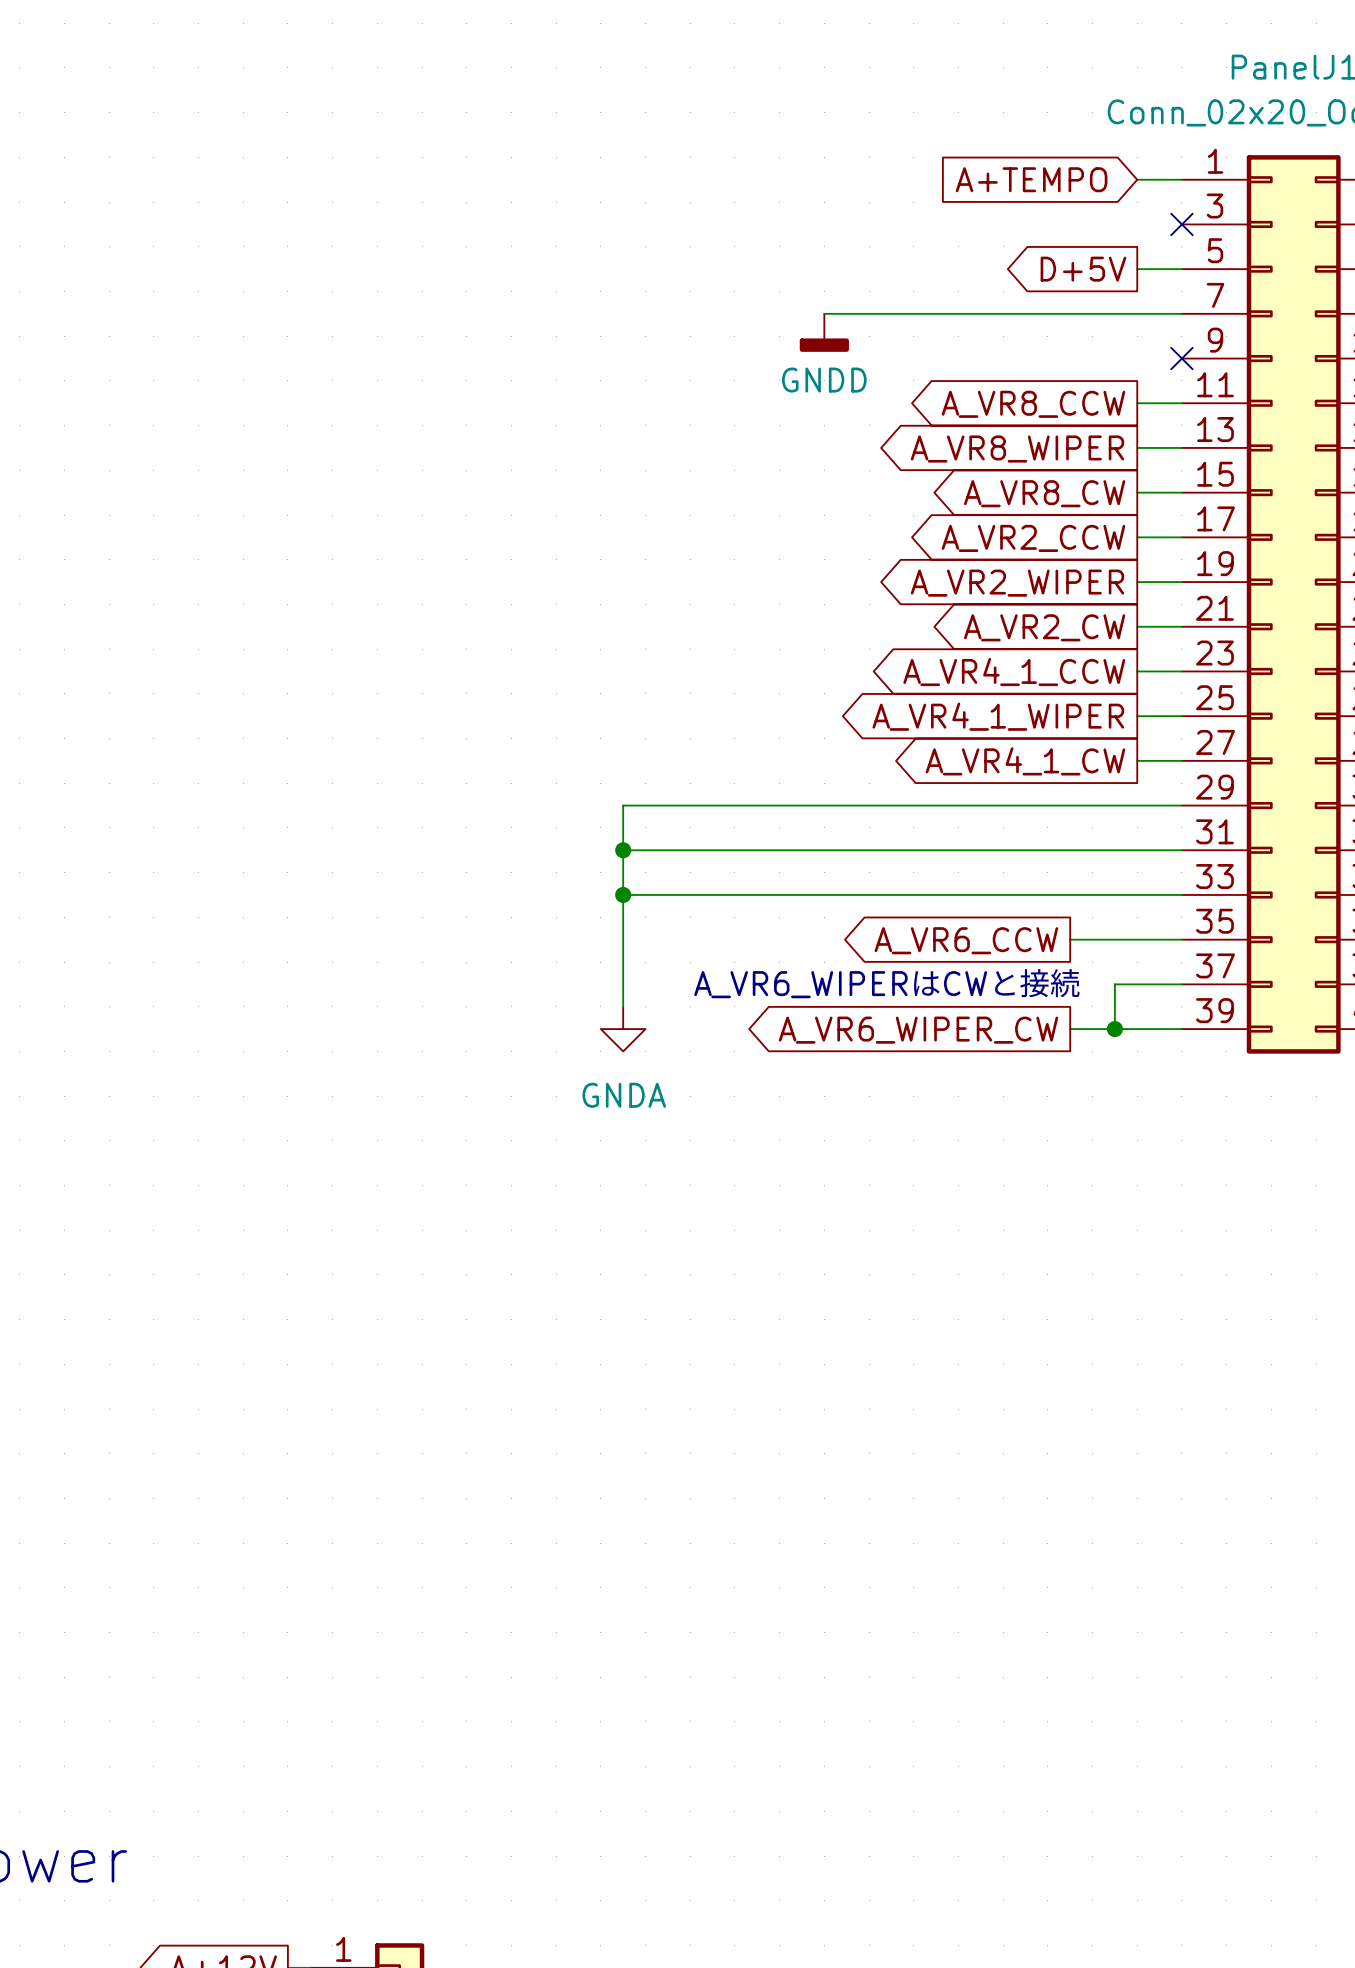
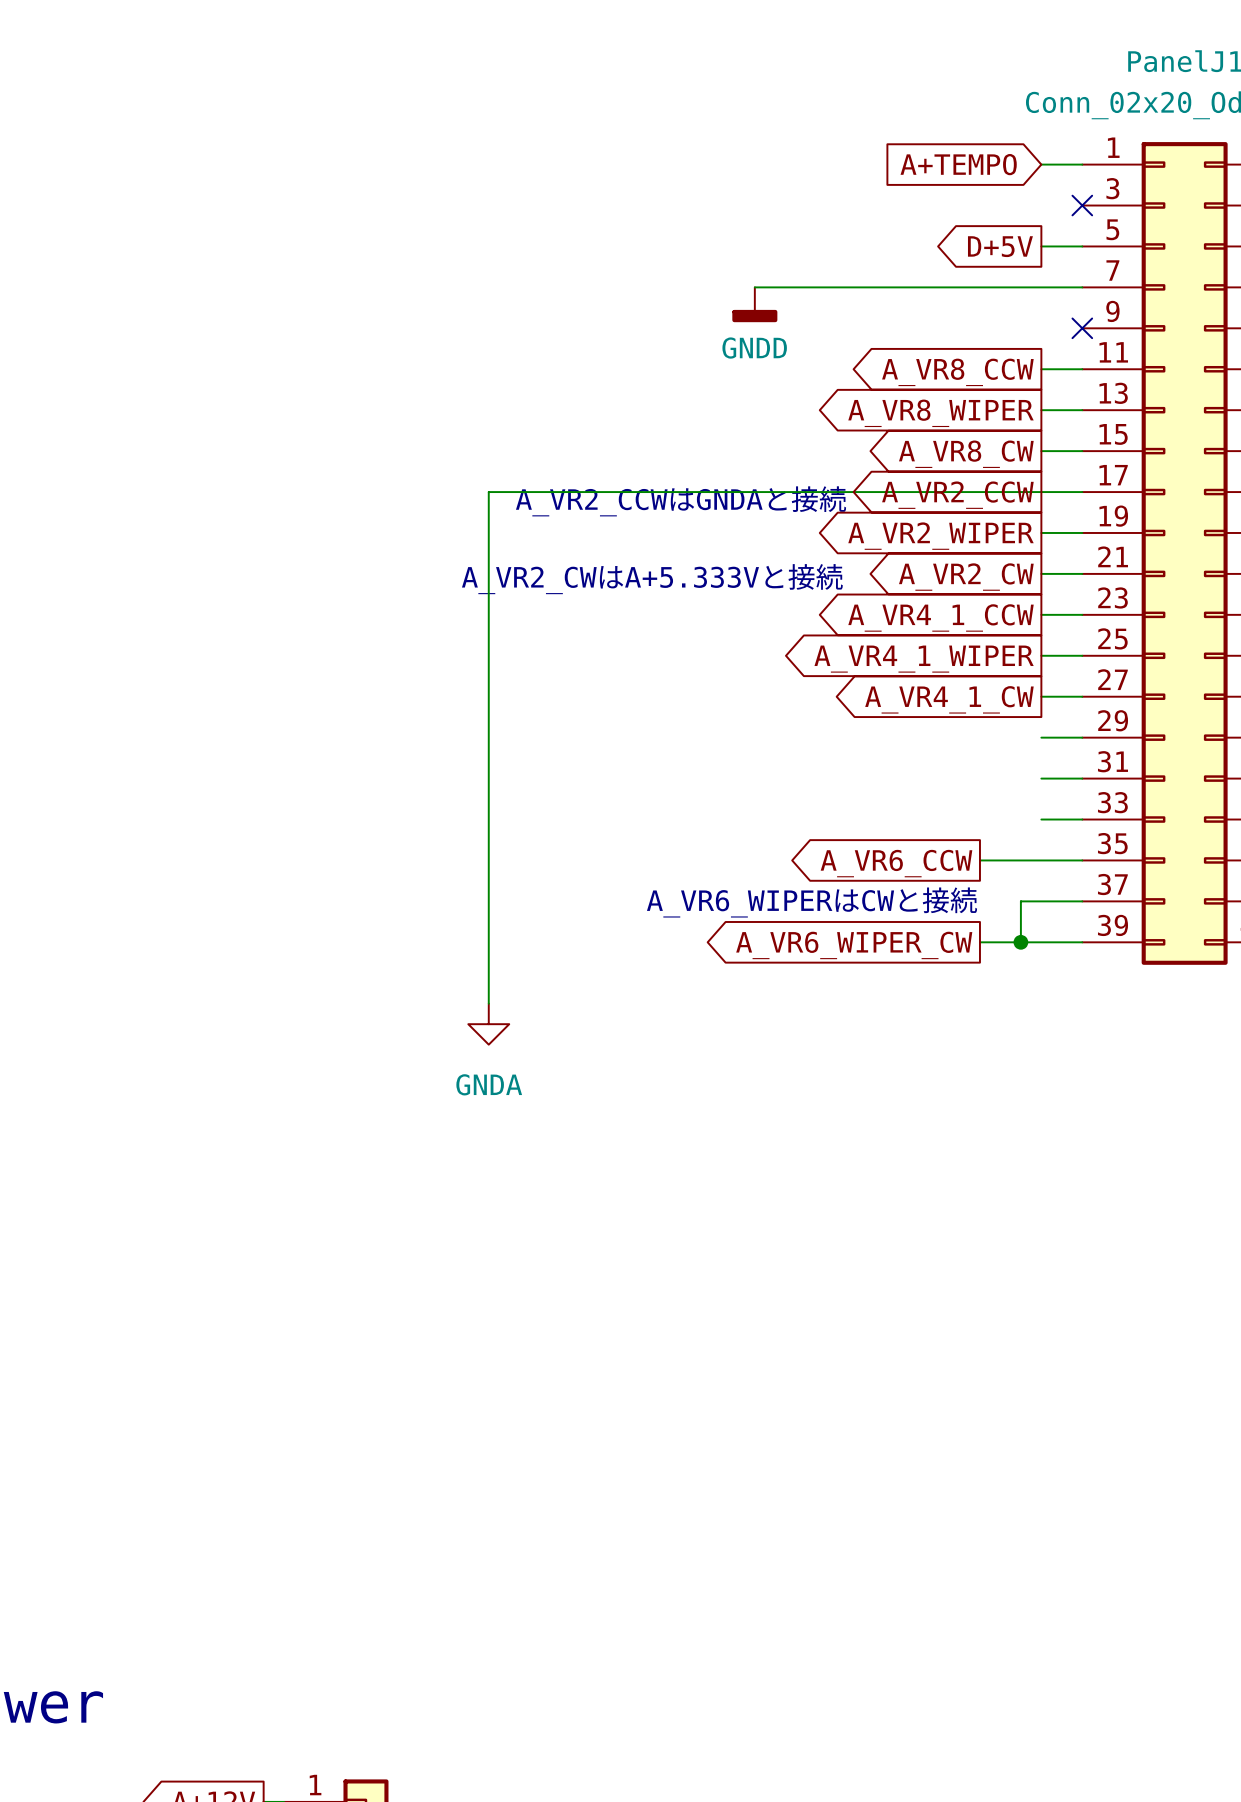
wire: none -> (1041, 492) (488, 492) (488, 1003)
text: none -> A_VR2_CCWはGNDAと接続 (681, 501)
text: none -> A_VR2_CWはA+5.333Vと接続 (652, 579)
wire: (1137, 805) (623, 805) (623, 1006) -> none
wire: (623, 850) (1137, 850) -> none
junction: (623, 850) -> none
wire: (623, 894) (1137, 894) -> none
junction: (623, 894) -> none
power symbol position: GNDA (623, 1029) -> GNDA (488, 1024)

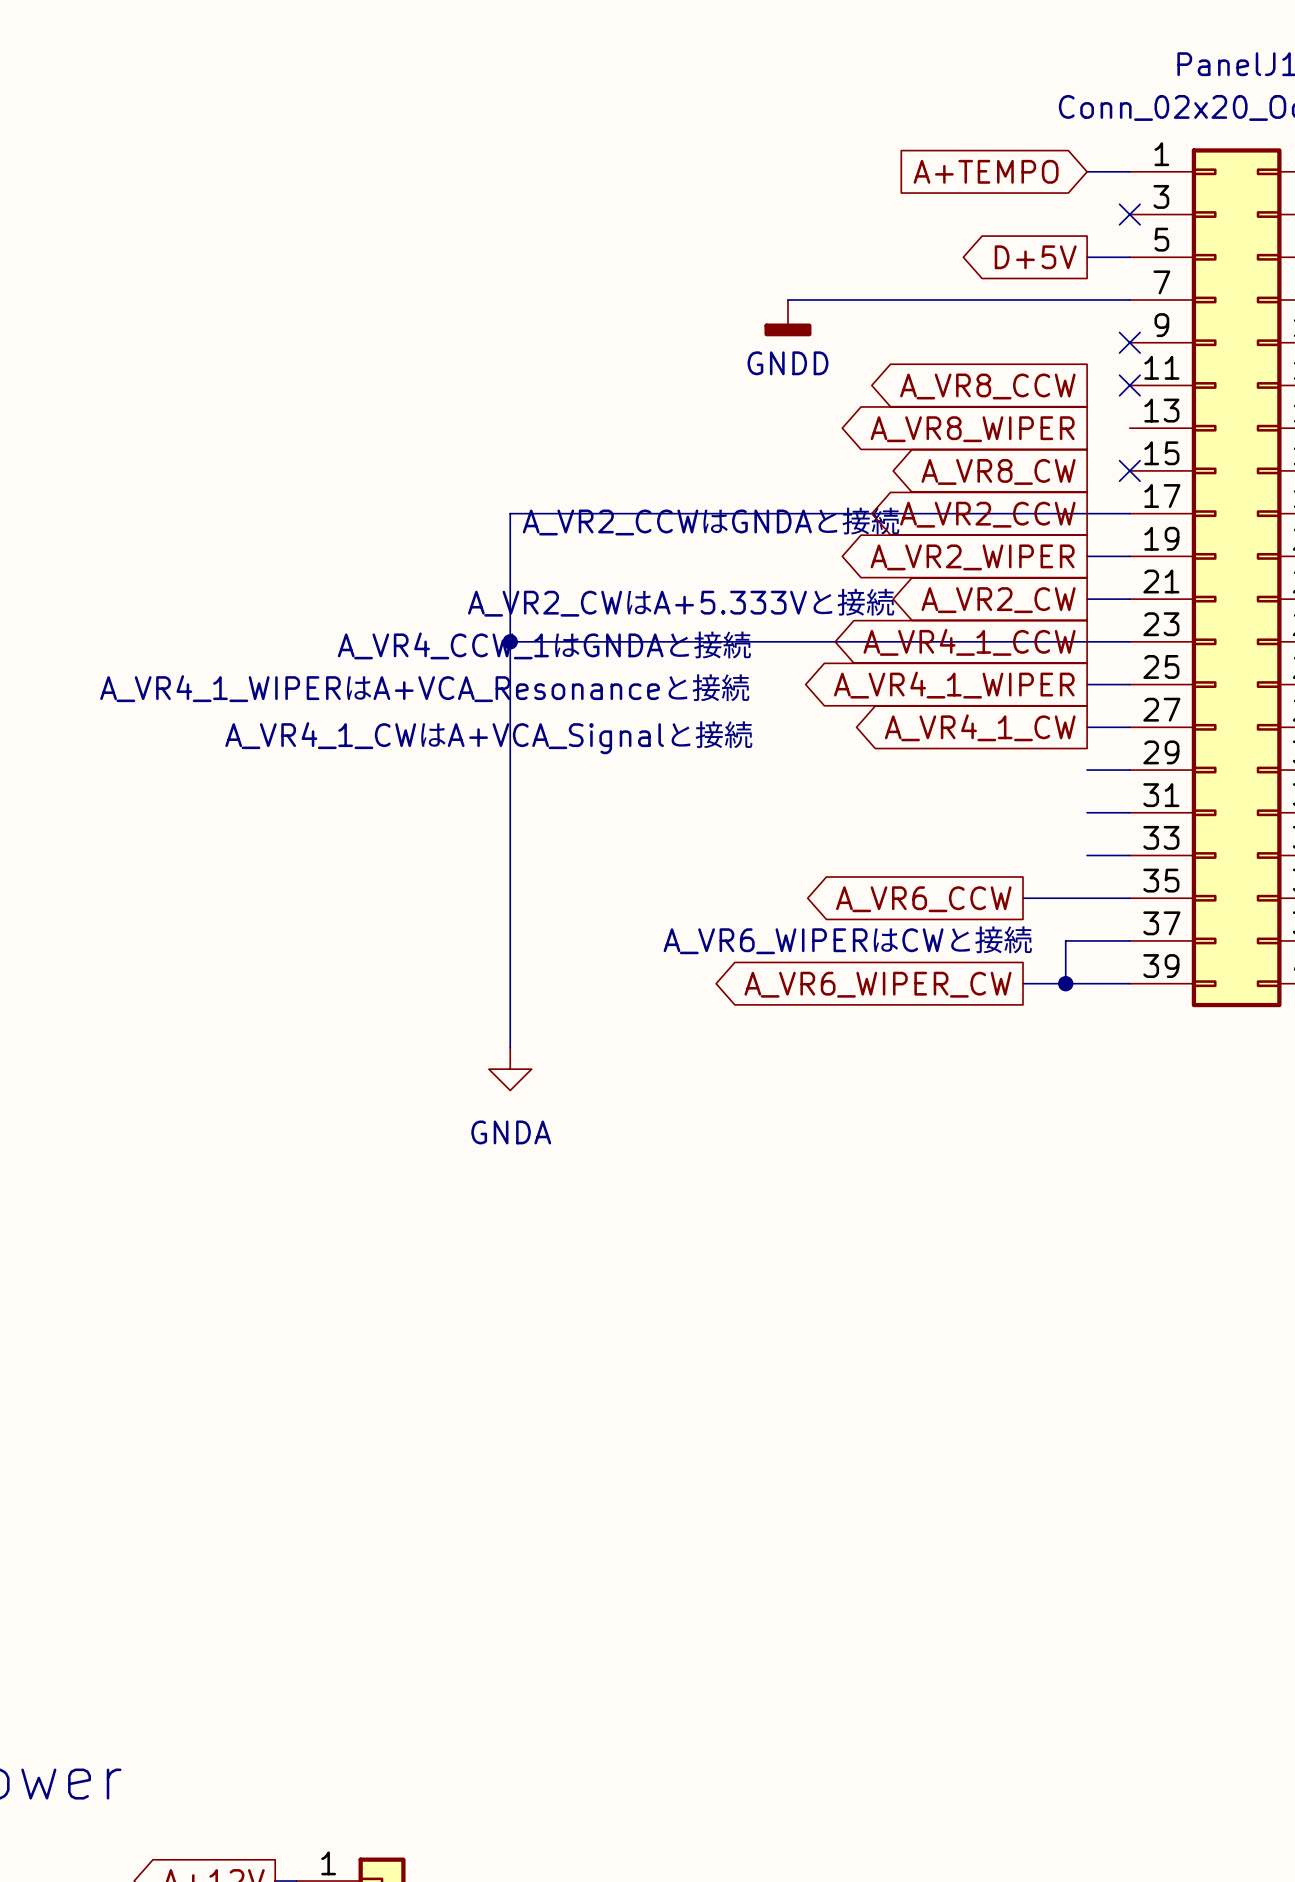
wire: (1041, 369) (1082, 369) -> none
no-connect mark: none -> (1129, 385)
wire: (1041, 410) (1082, 410) -> none
wire: (1041, 451) (1082, 451) -> none
no-connect mark: none -> (1129, 470)
wire: none -> (510, 641) (1087, 641)
junction: none -> (510, 641)
text: none -> A_VR4_CCW_1はGNDAと接続 (545, 644)
text: none -> A_VR4_1_WIPERはA+VCA_Resonanceと接続 (425, 687)
text: none -> A_VR4_1_CWはA+VCA_Signalと接続 (489, 737)

